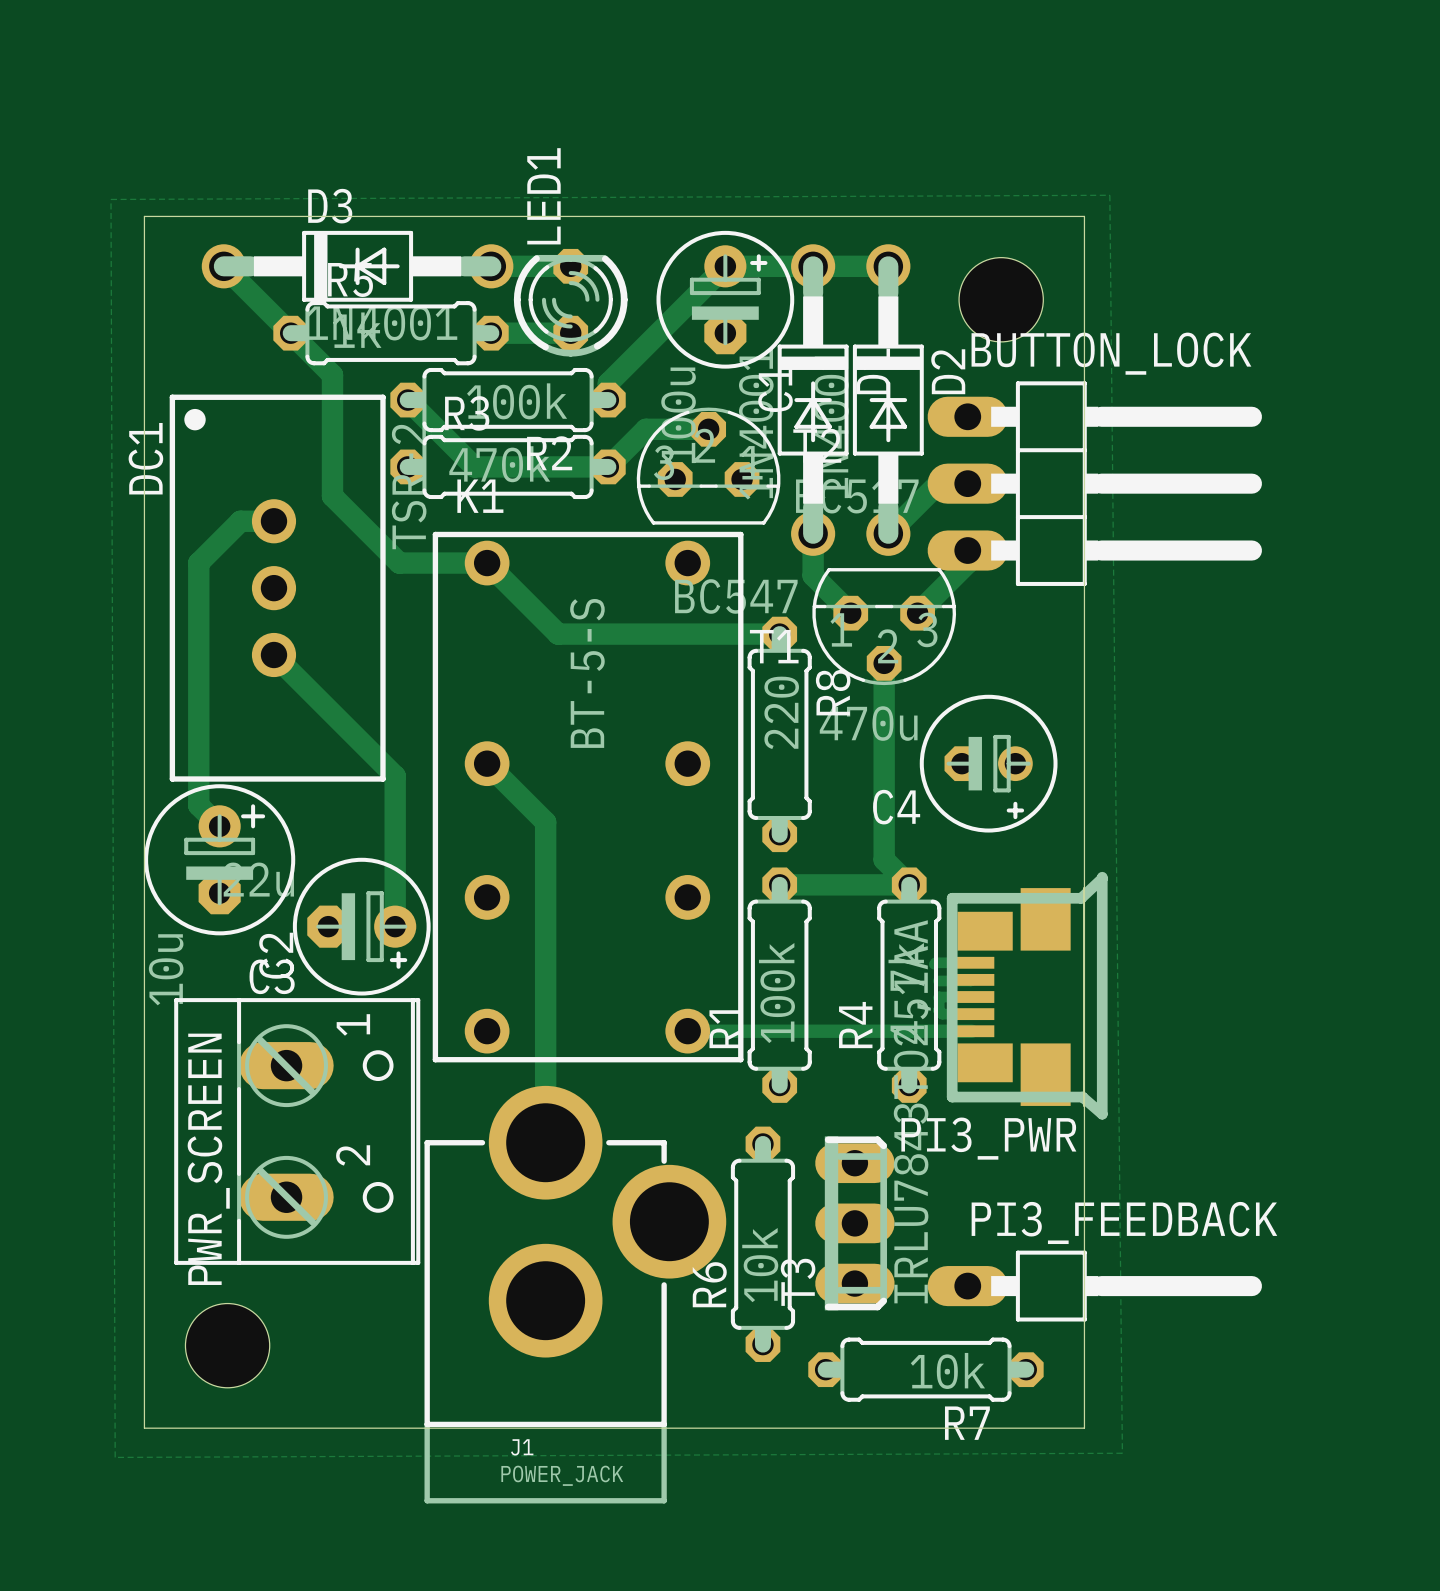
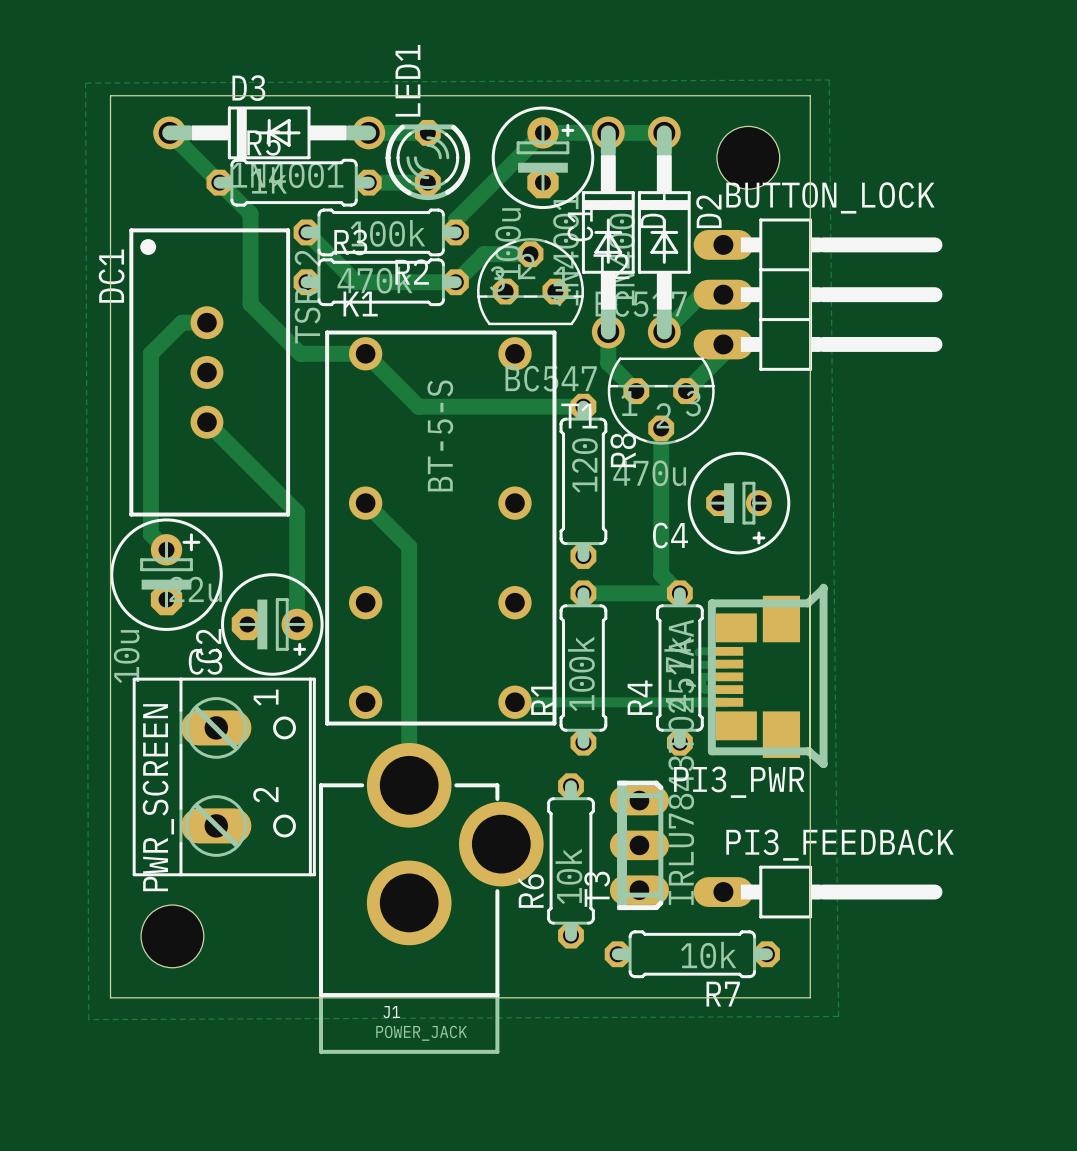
R8 value: 220 (781, 712) -> 120 (584, 465)

